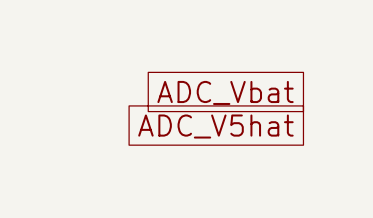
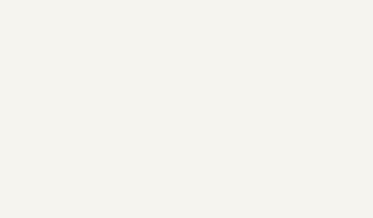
global label: ADC_Vbat (225, 92) -> none
global label: ADC_V5hat (215, 126) -> none

